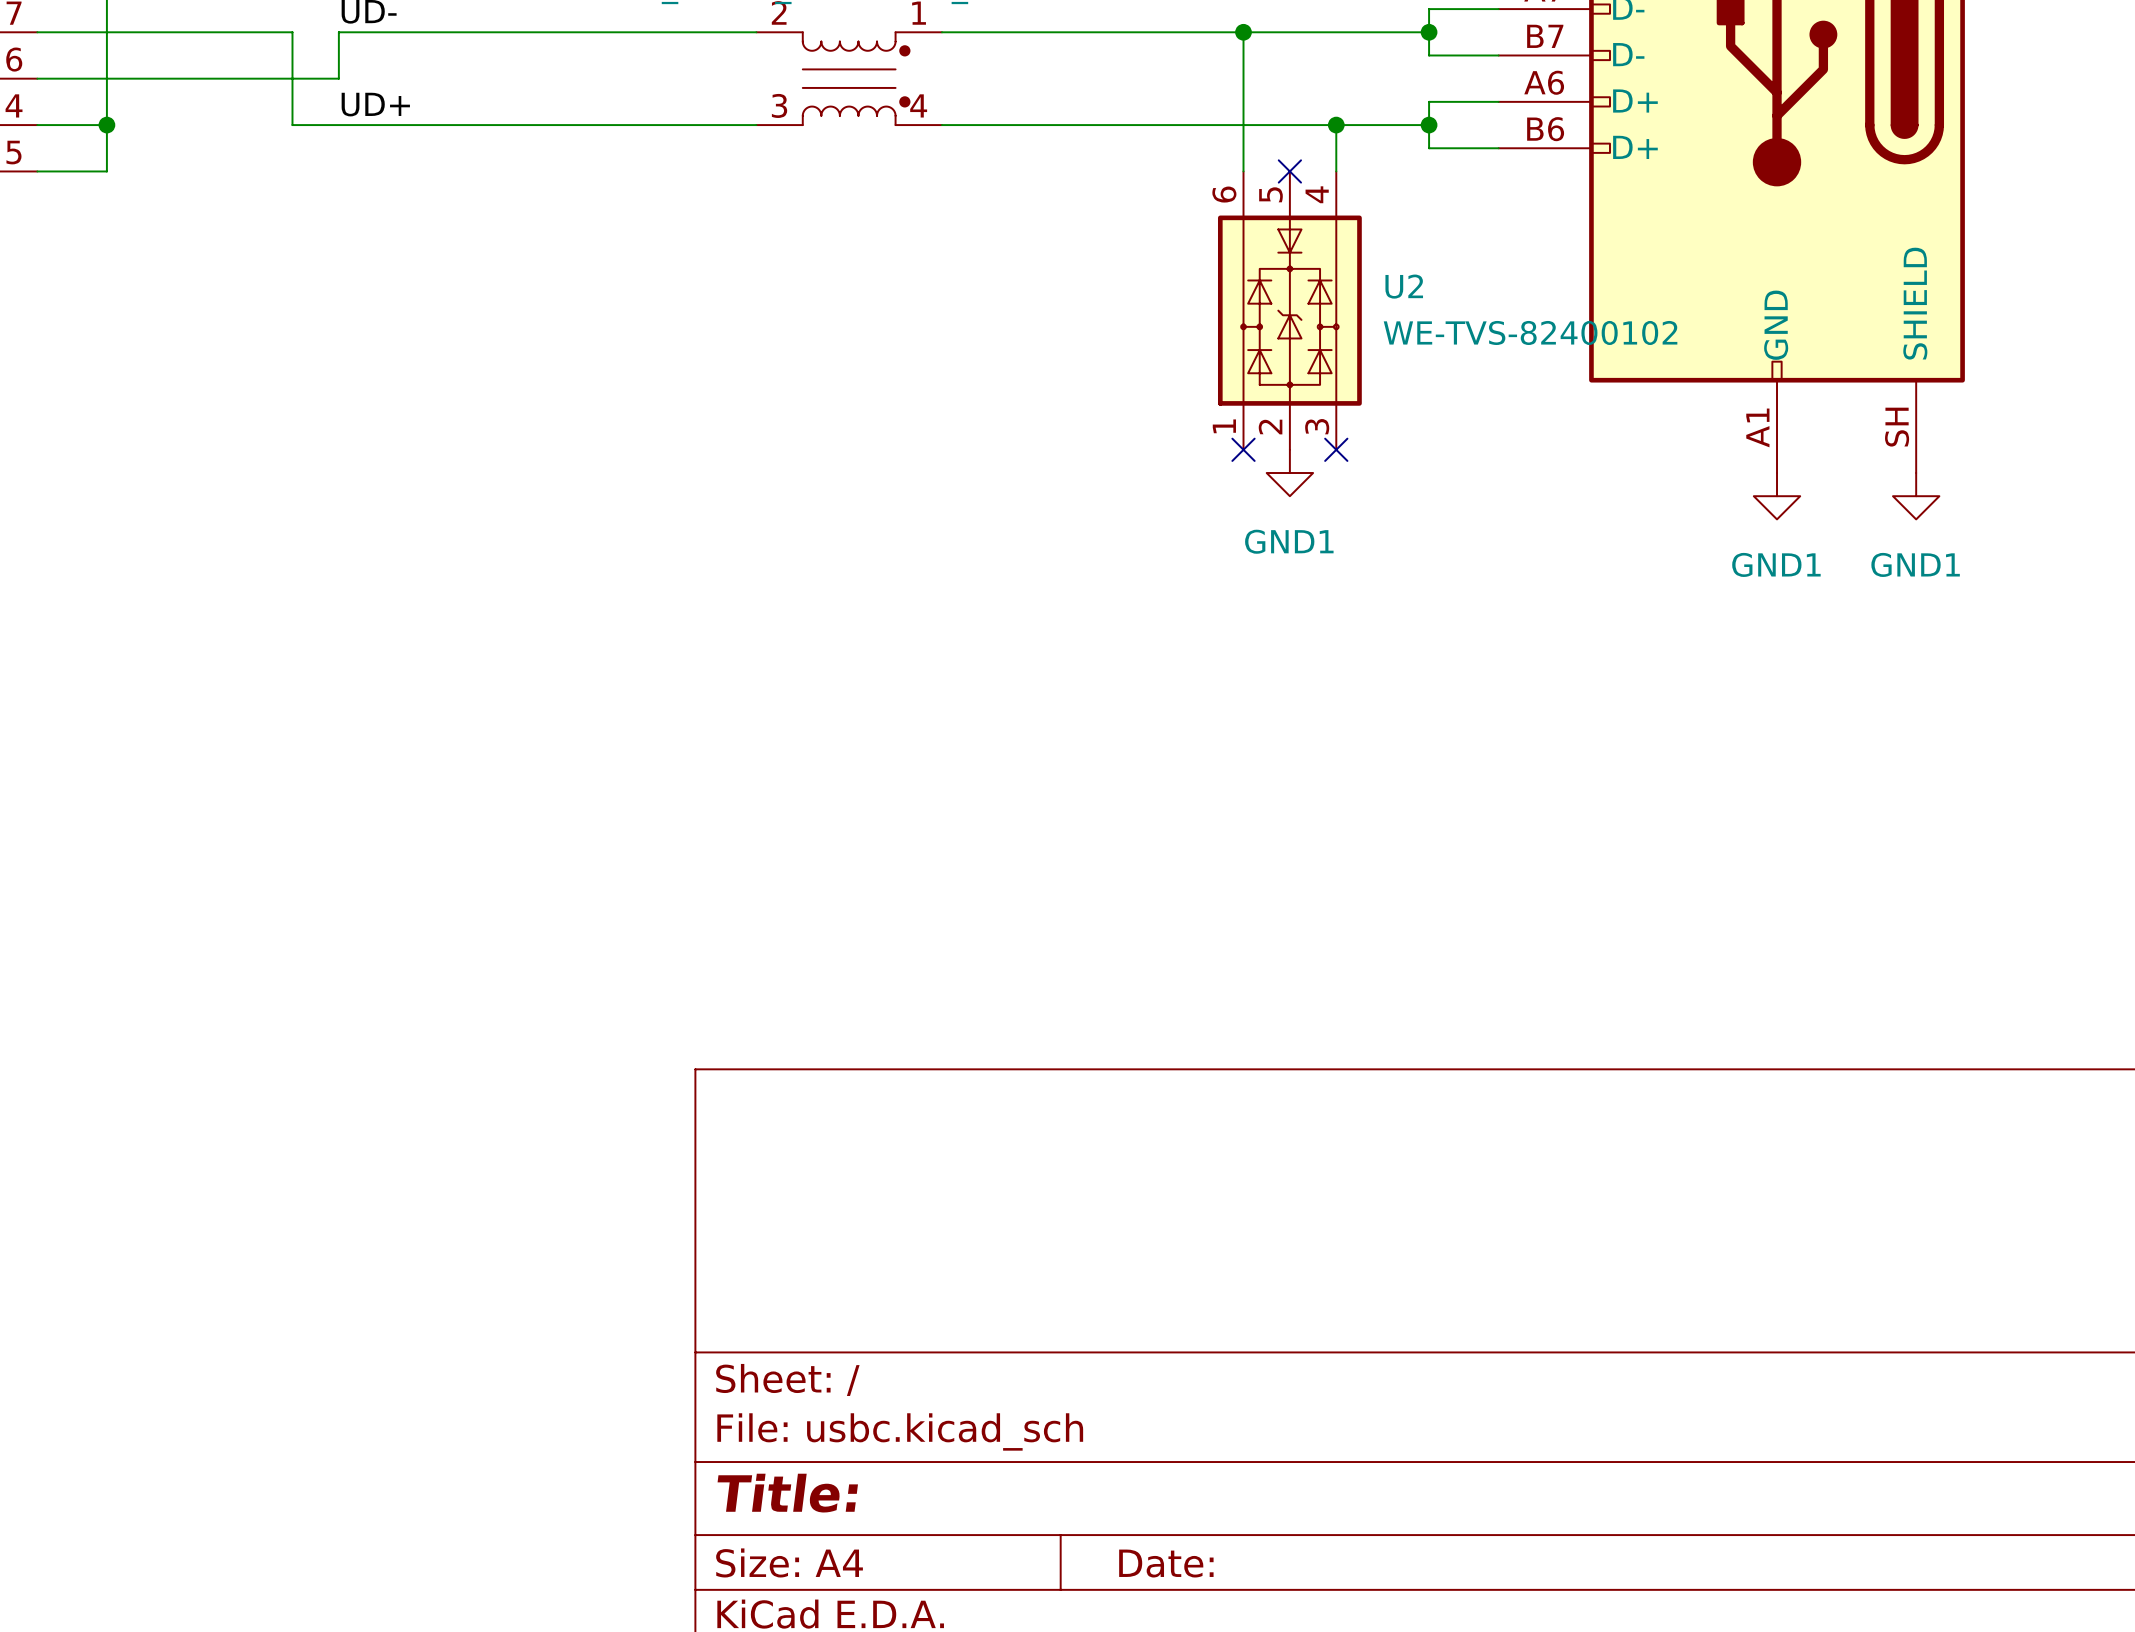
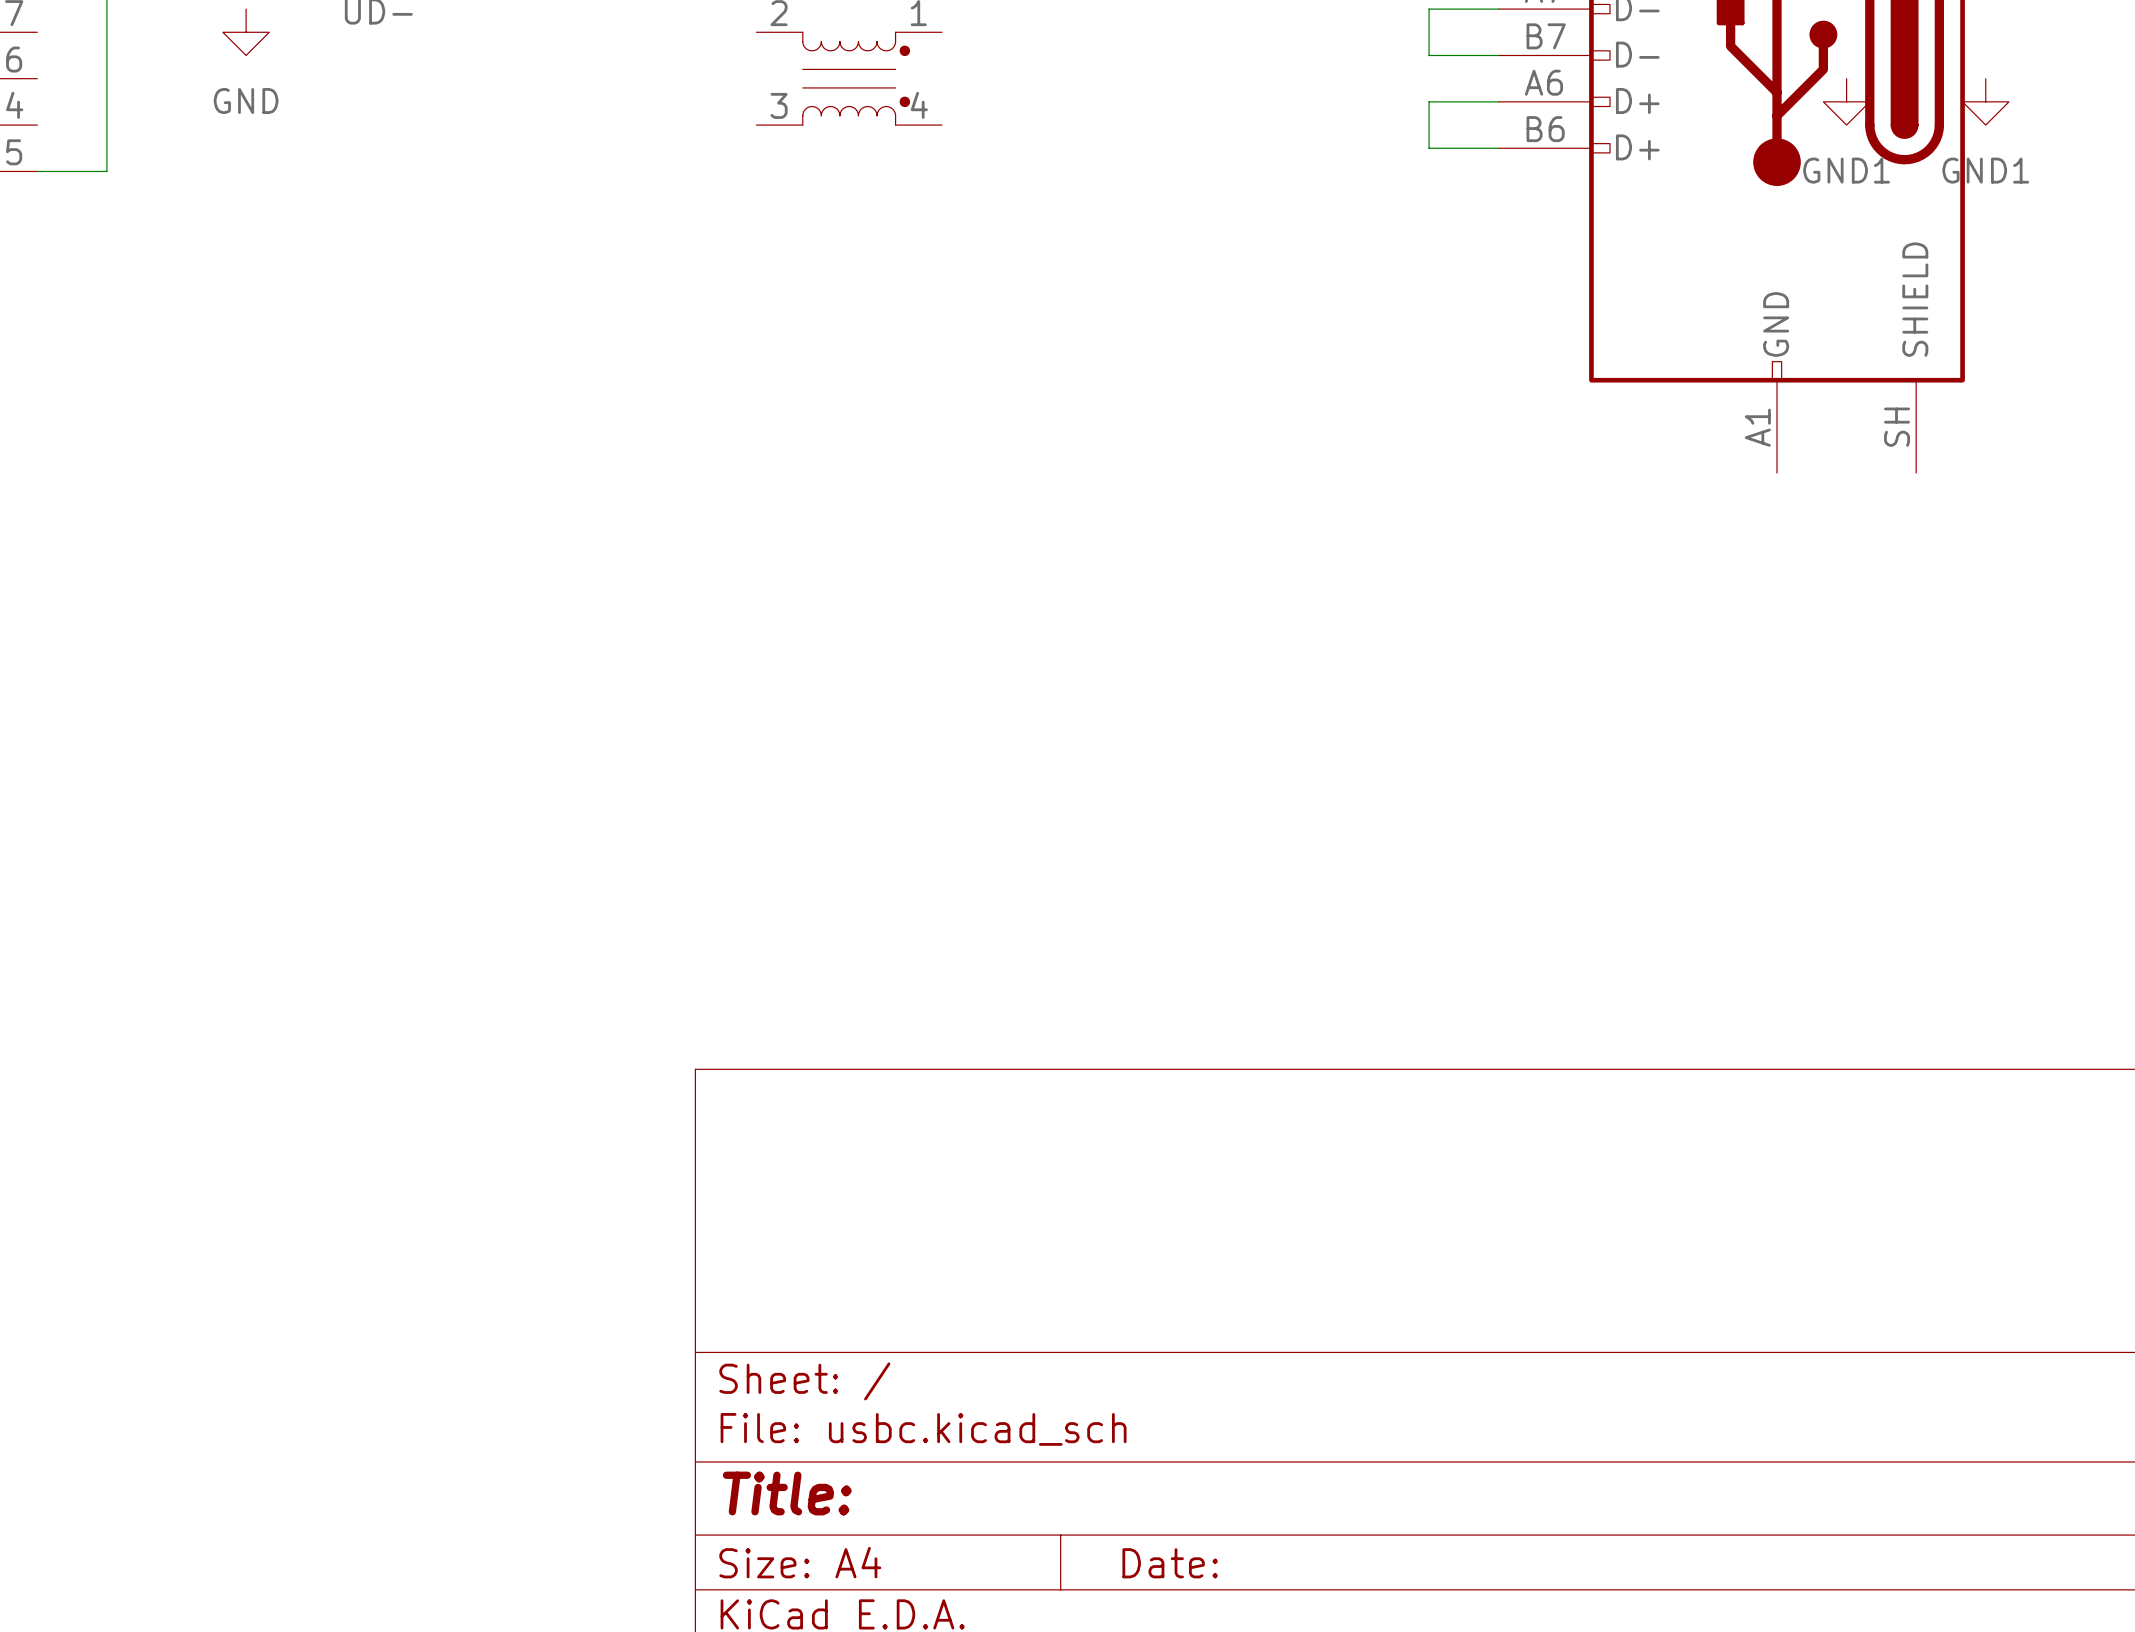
wire: (37, 32) (292, 32) (292, 125) (756, 125) -> none
power symbol: none -> GND (246, 32)
wire: (756, 32) (338, 32) (338, 78) (37, 78) -> none
wire: (941, 32) (1429, 32) -> none
wire: (1243, 32) (1243, 171) -> none
junction: (1243, 32) -> none
junction: (1429, 32) -> none
power symbol: none -> GND1 (1846, 101)
power symbol: none -> GND1 (1985, 101)
label: UD+ (375, 104) -> none
wire: (37, 125) (106, 125) -> none
junction: (106, 125) -> none
wire: (941, 125) (1429, 125) -> none
wire: (1336, 125) (1336, 171) -> none
junction: (1336, 125) -> none
junction: (1429, 125) -> none
no-connect mark: (1289, 171) -> none
U2: WE-TVS-82400102 (1289, 310) -> none
no-connect mark: (1243, 449) -> none
no-connect mark: (1336, 449) -> none
power symbol: GND1 (1289, 473) -> none
power symbol: GND1 (1777, 496) -> none
power symbol: GND1 (1916, 496) -> none

